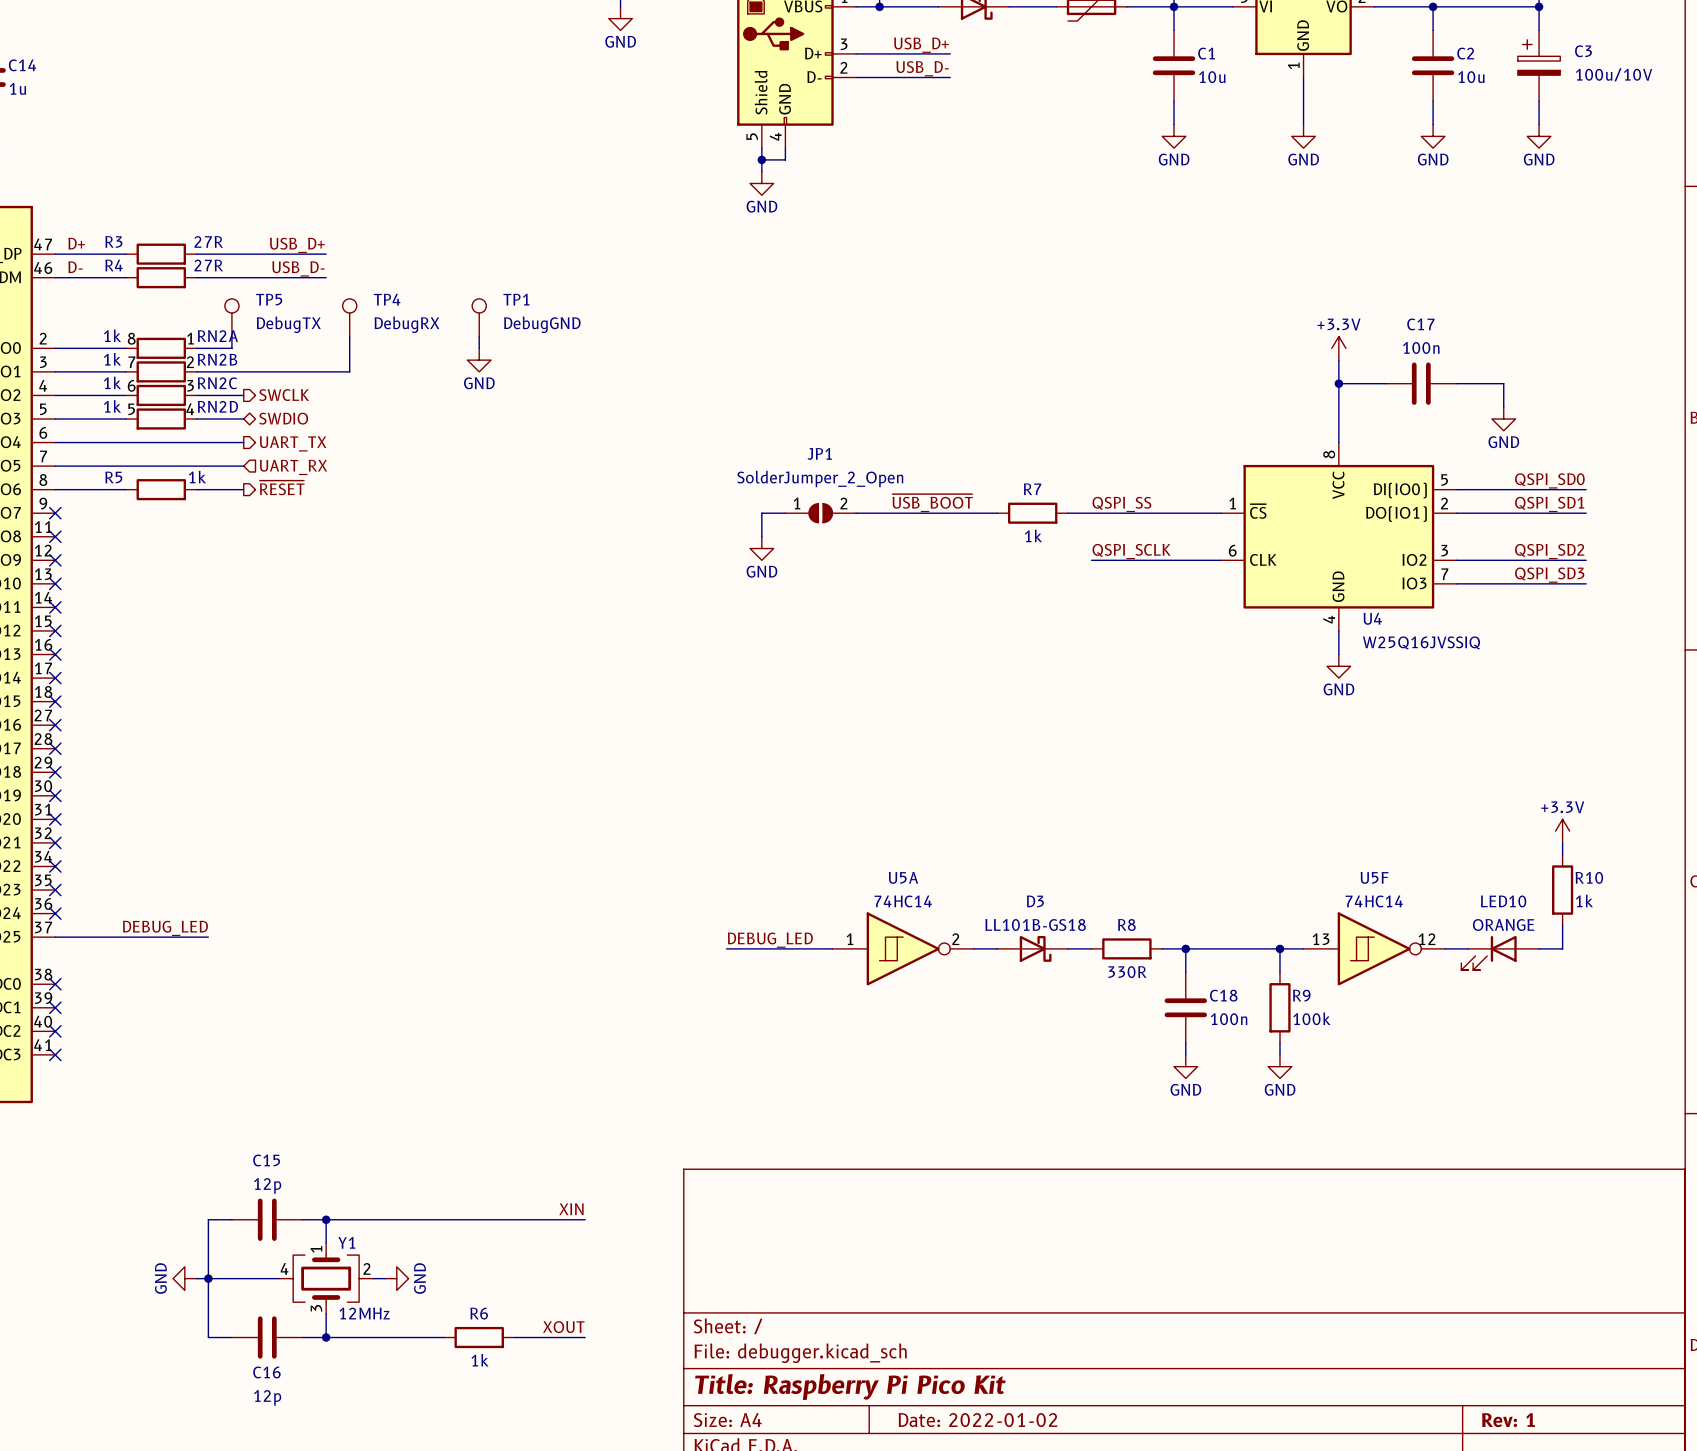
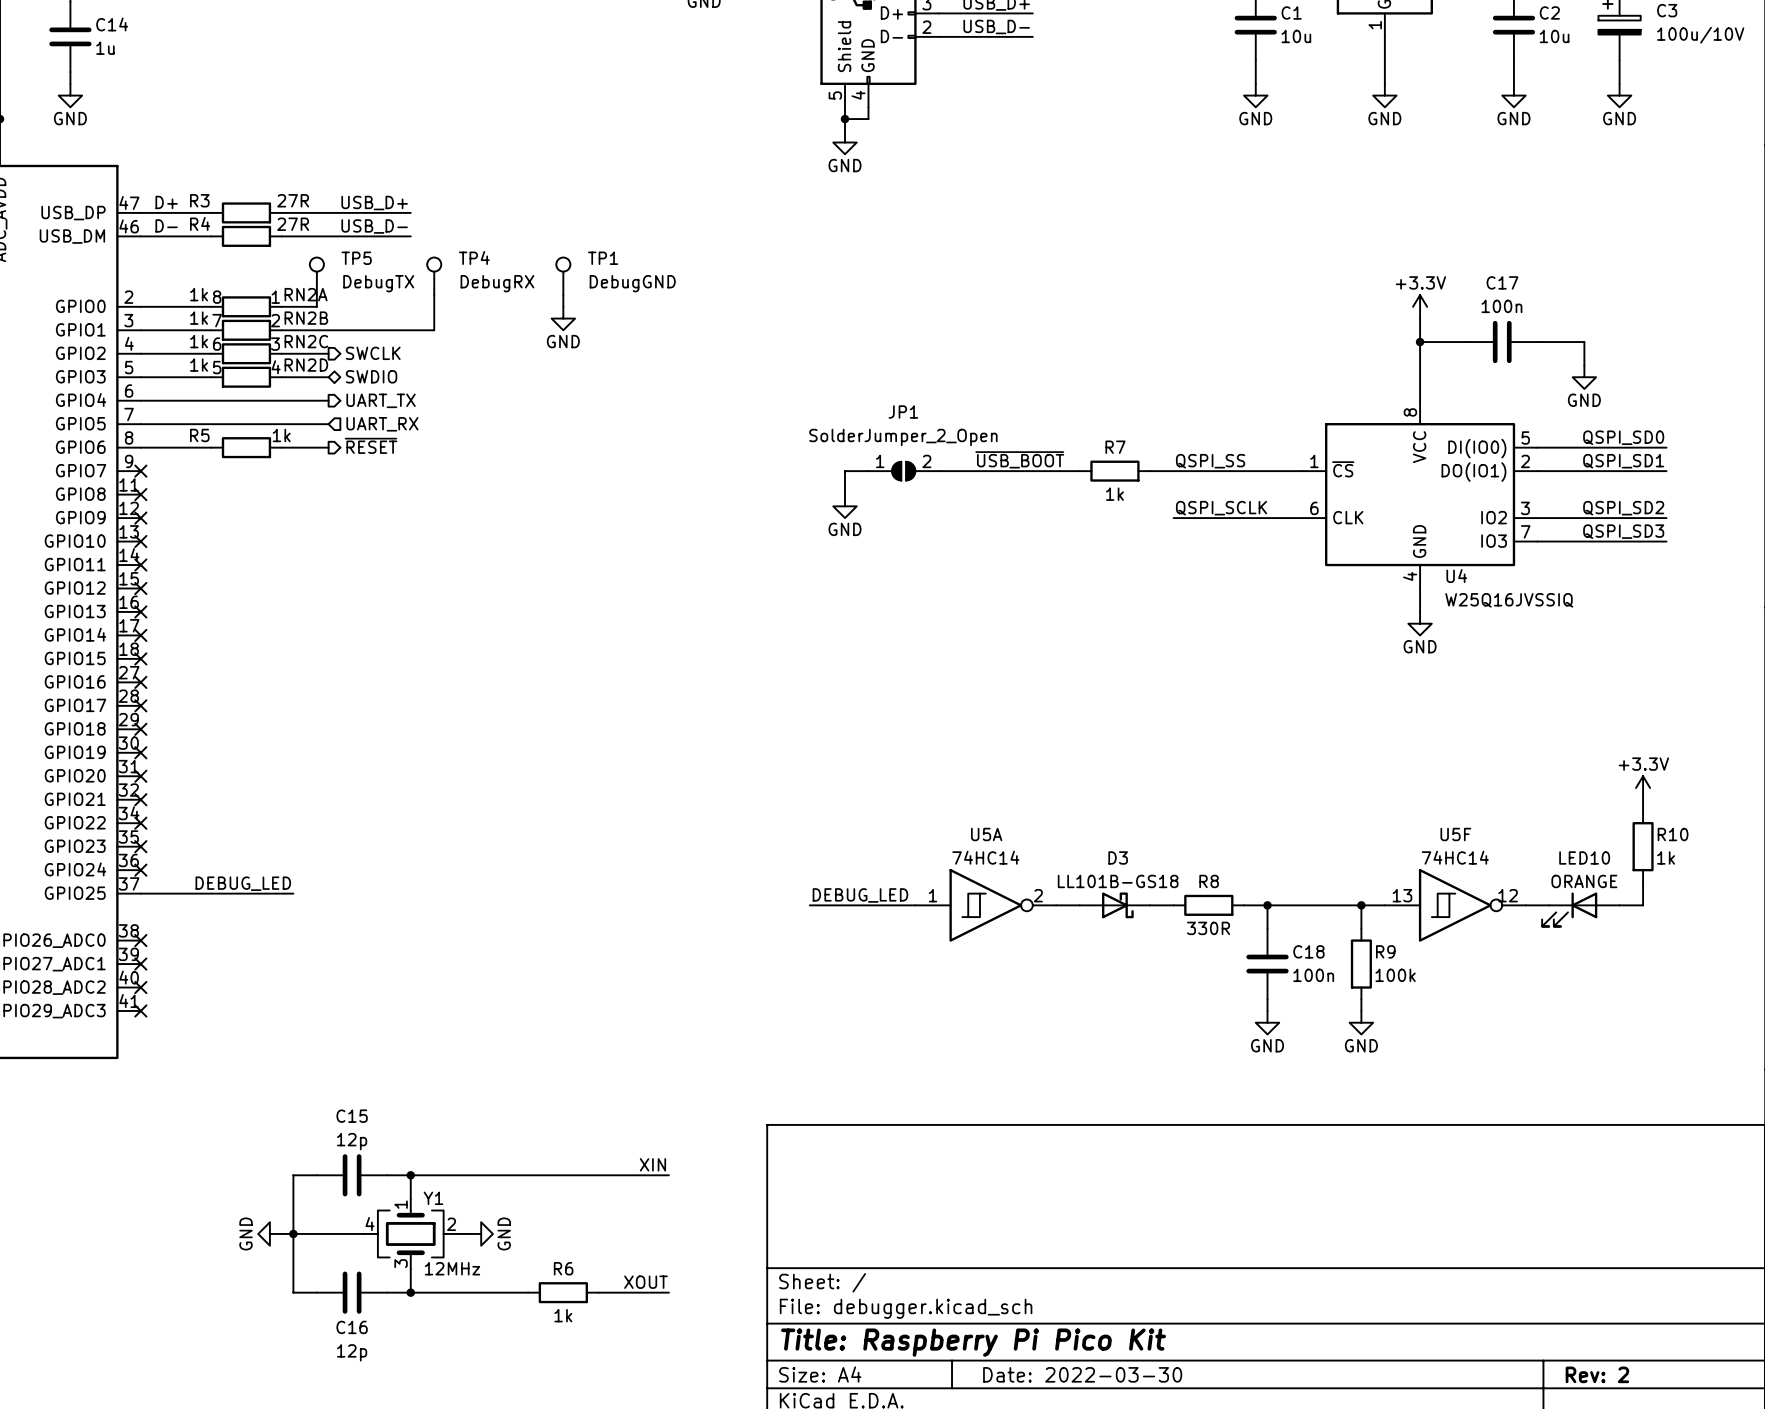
title block: Date: 2022-01-02 (977, 1420) -> Date: 2022-03-30 (1082, 1374)
title block: Rev: 1 (1508, 1420) -> Rev: 2 (1597, 1374)

